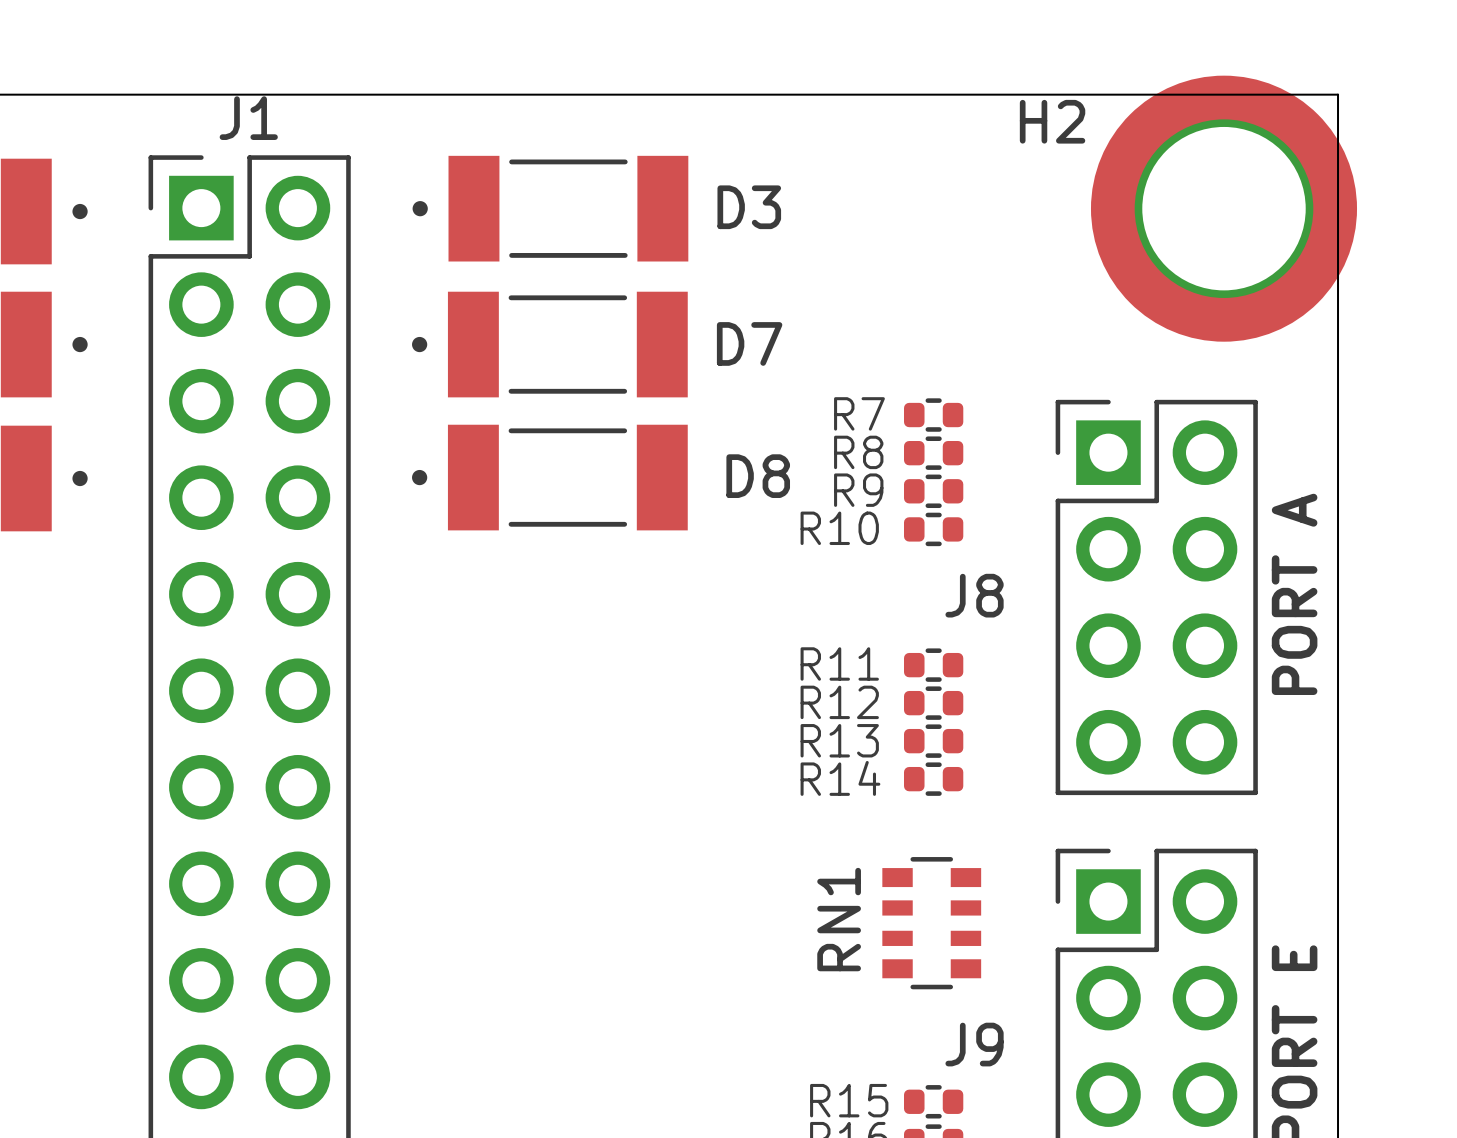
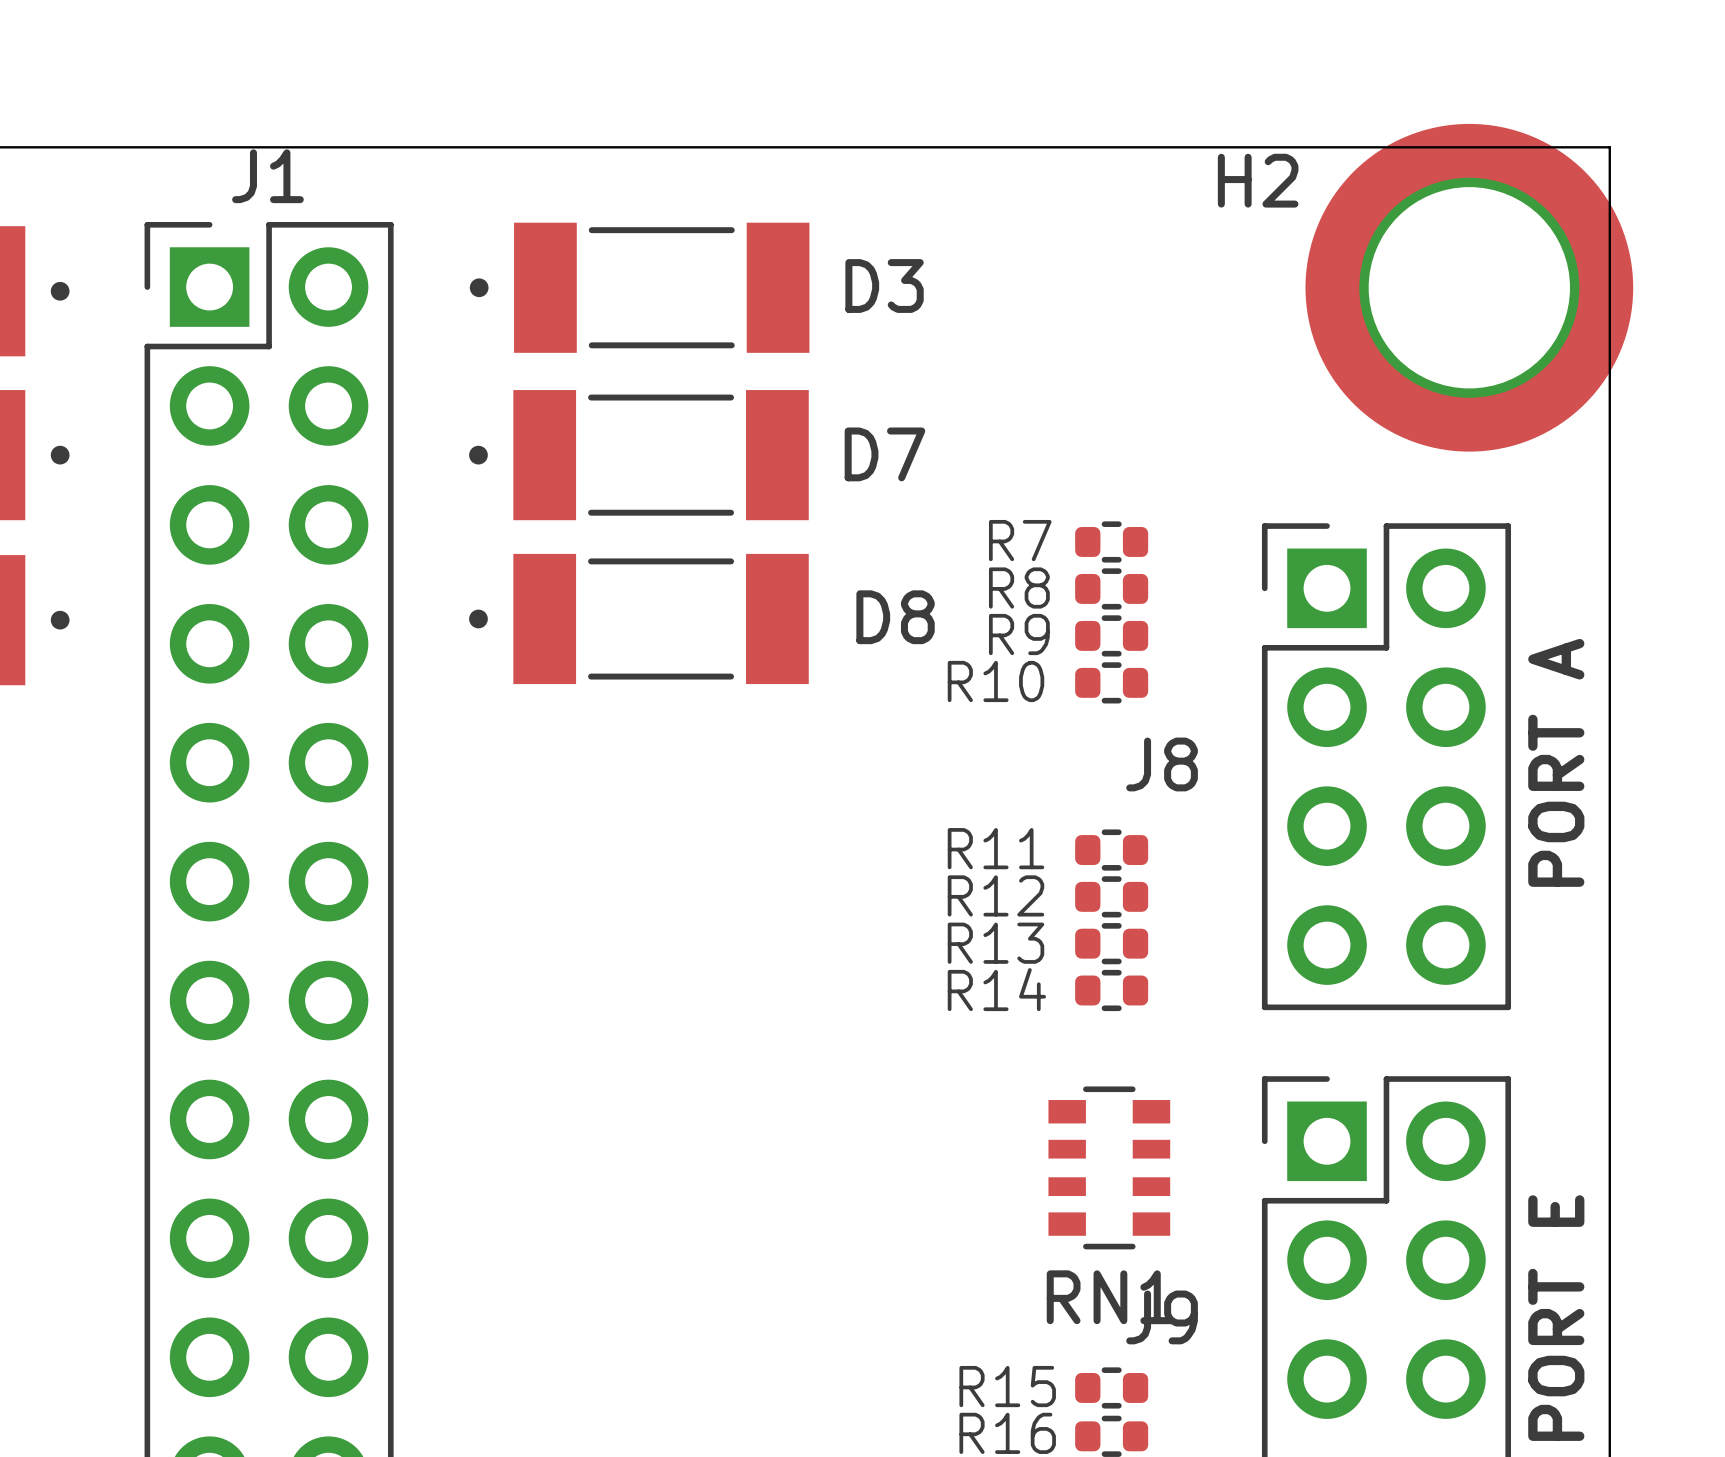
RN1 name rotation: 0° (839, 919) -> 90° clockwise (1110, 1297)
RN1 name position: RN1 (839, 919) -> RN1 (1110, 1297)

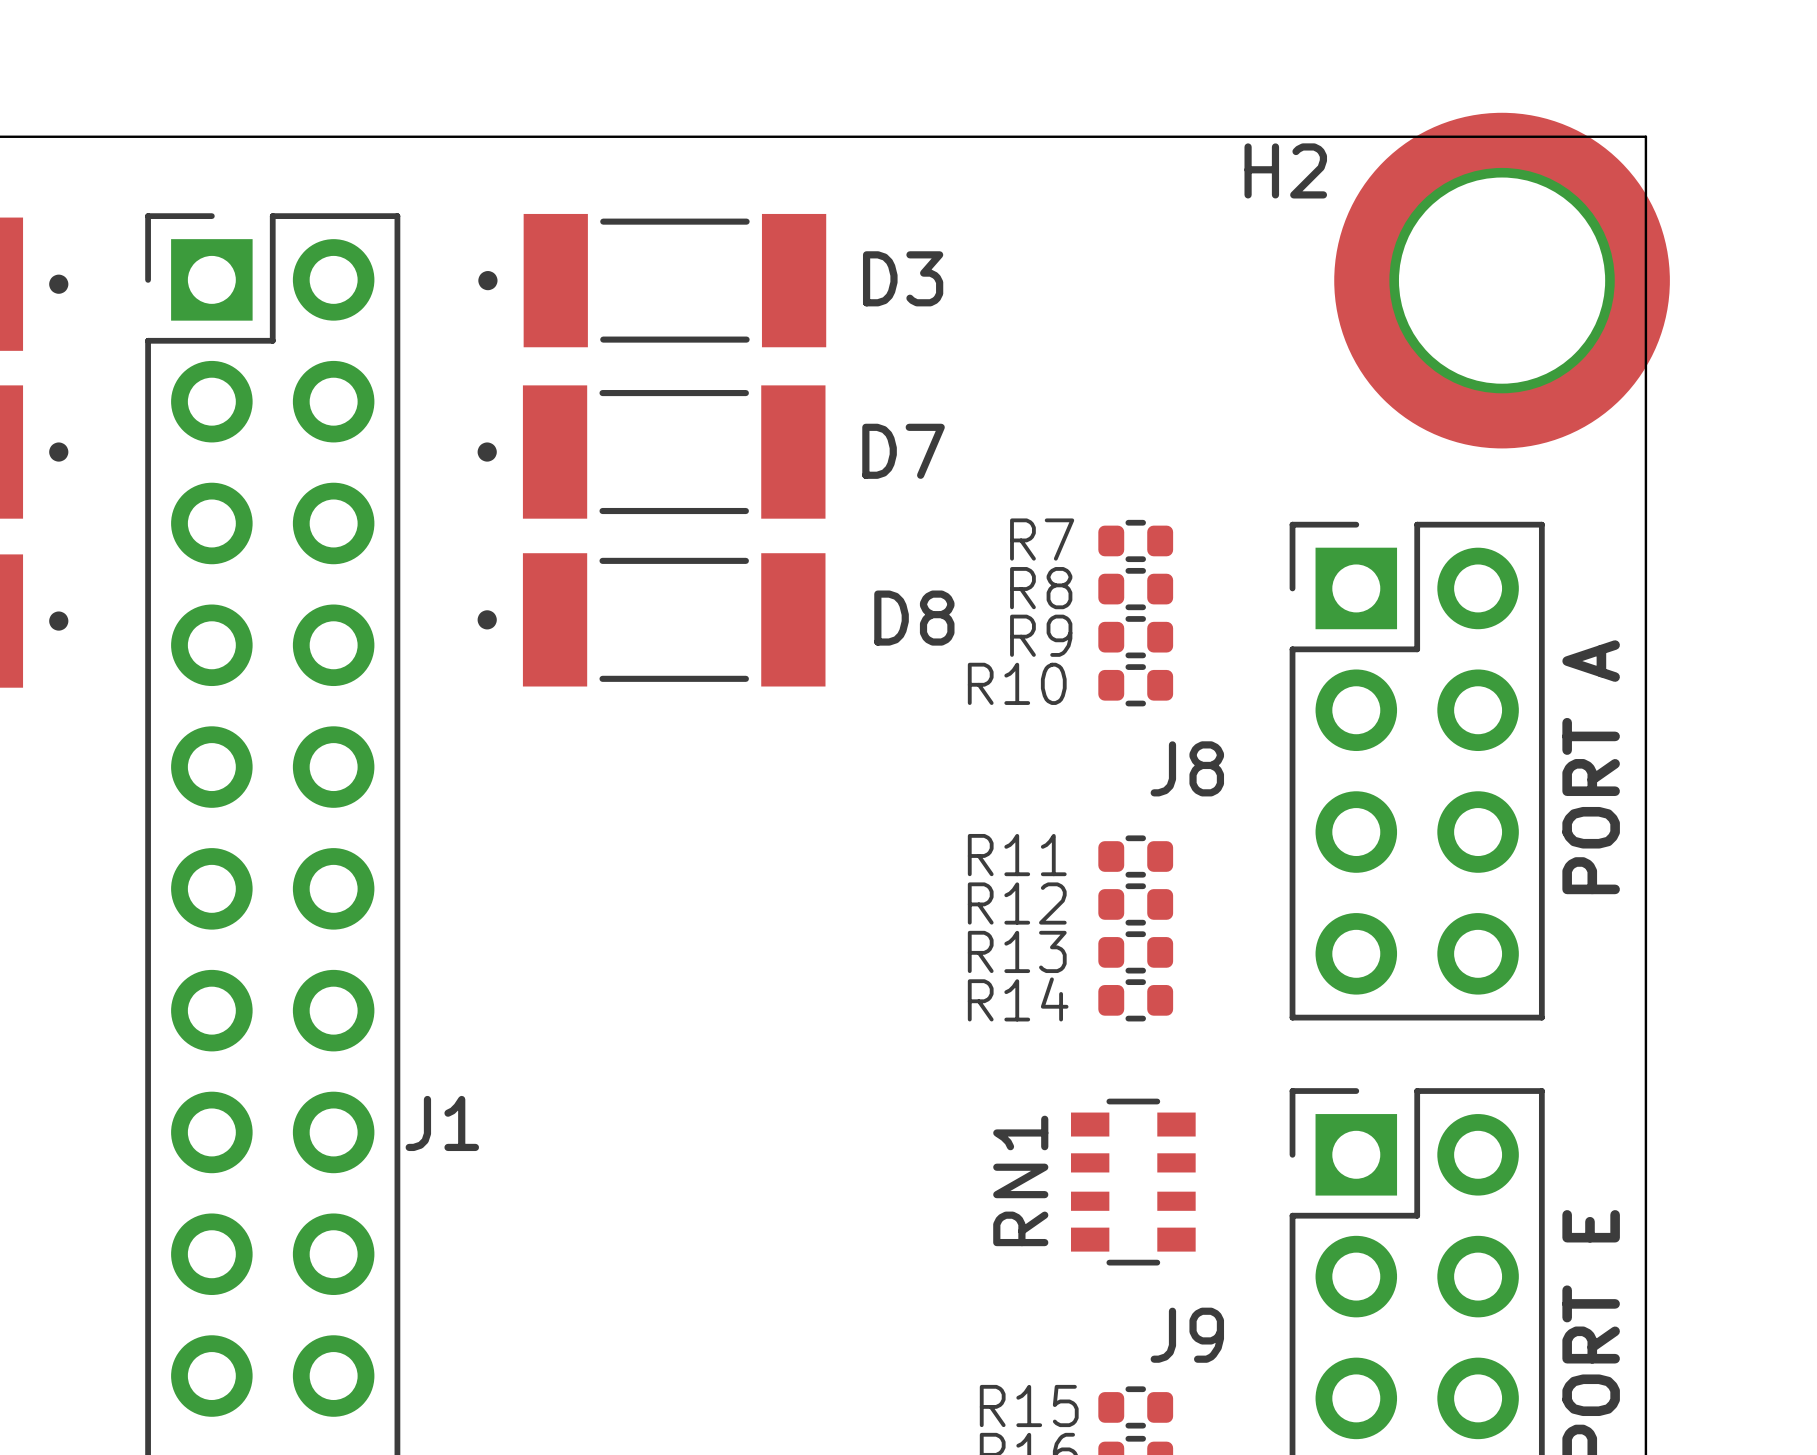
J1 name position: J1 (267, 176) -> J1 (442, 1123)
RN1 name rotation: 0° (1110, 1297) -> 90° counterclockwise (1020, 1180)
RN1 name position: RN1 (1110, 1297) -> RN1 (1020, 1180)

